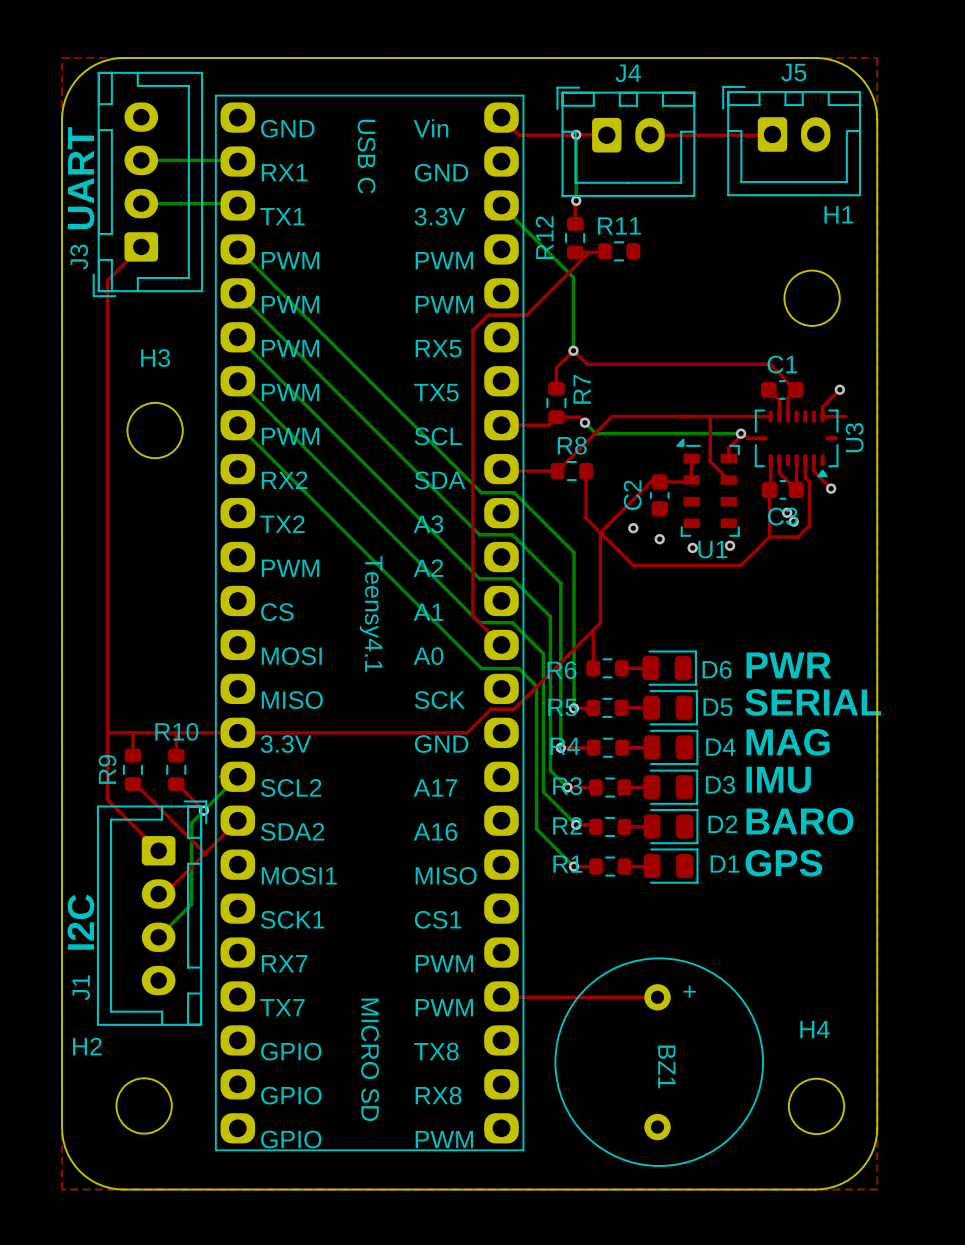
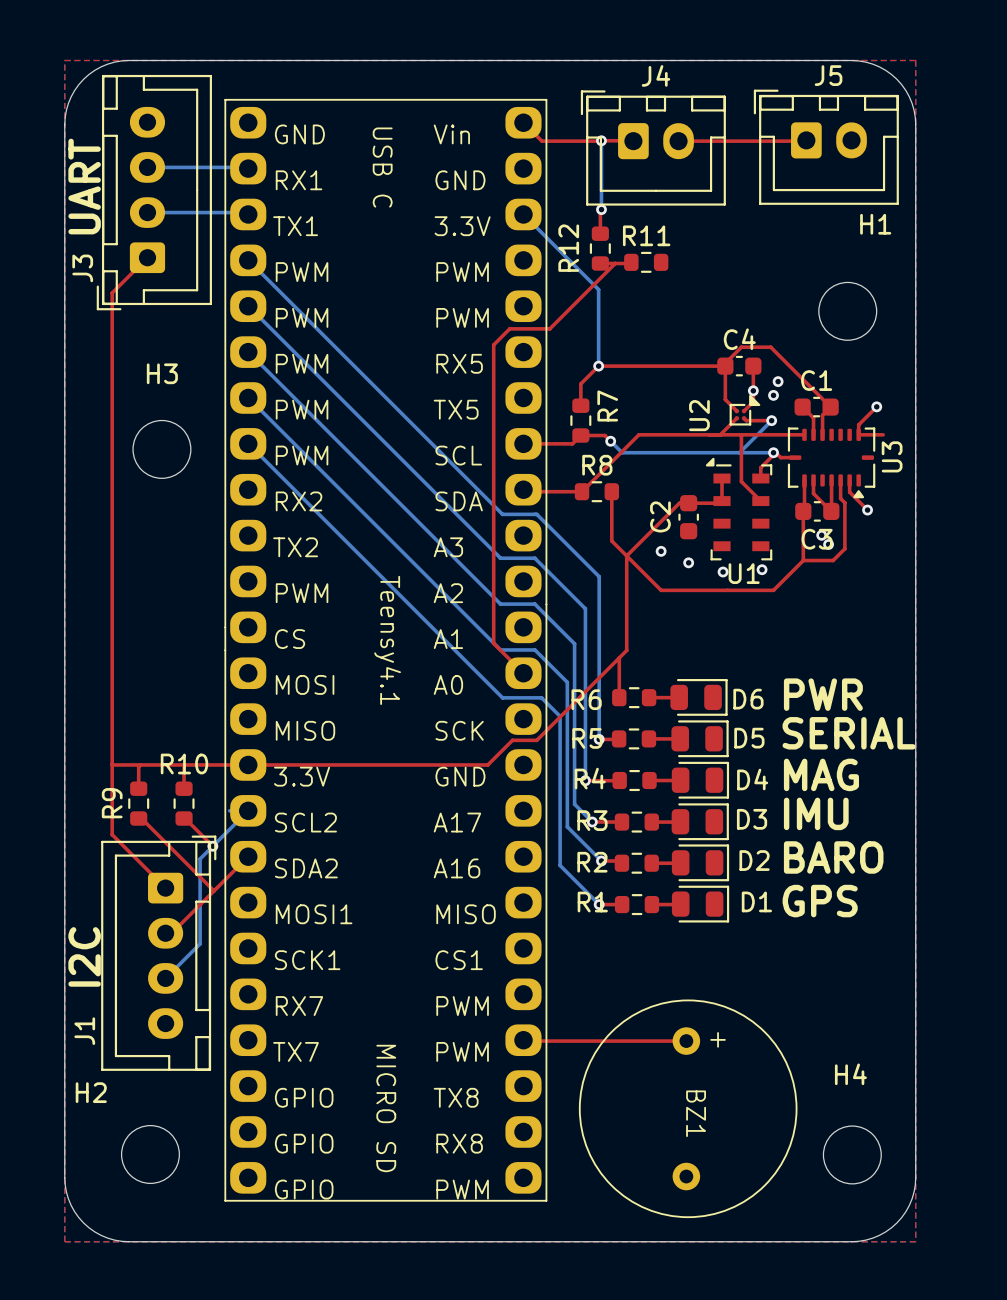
top track: (573, 350) (587, 364) (770, 364) -> (598, 366) (725, 366)
C4: none -> (739, 366)
top track: none -> (753, 366) (753, 401) (744, 410)
top track: none -> (803, 380) (770, 347) (741, 347) (725, 363) (725, 399) (736, 410)
via: none -> (778, 381)
via: none -> (753, 390)
via: none -> (773, 395)
U2: none -> (744, 410)
top track: none -> (736, 418) (720, 434)
top track: none -> (744, 418) (746, 420) (771, 420)
bottom track: none -> (771, 420) (739, 452)
via: none -> (771, 420)

